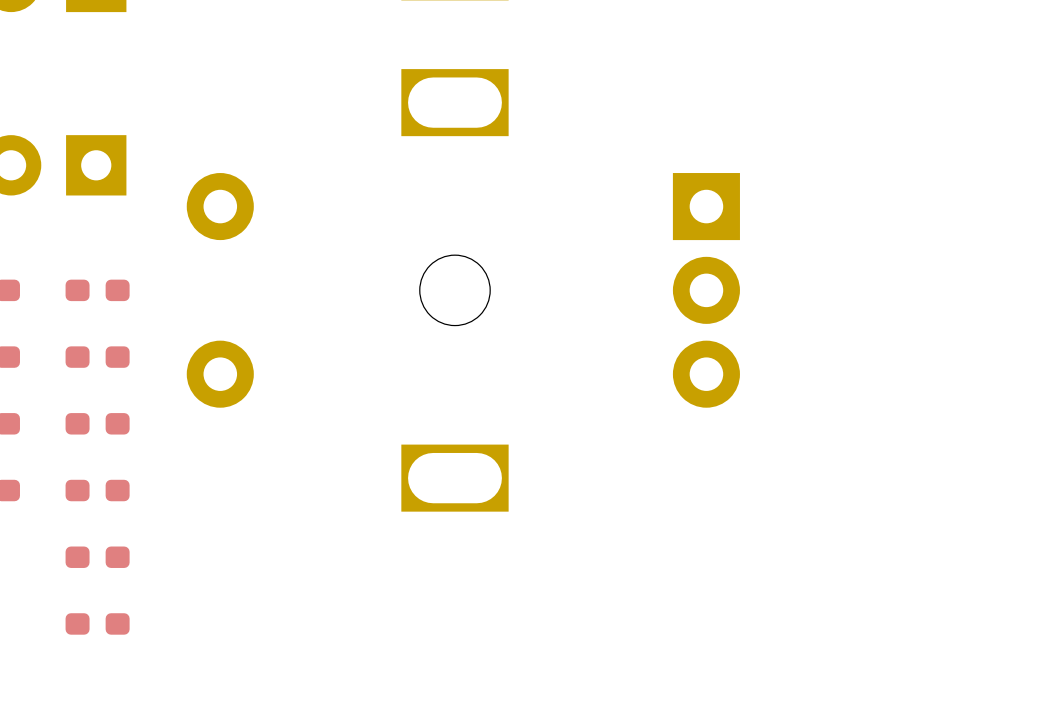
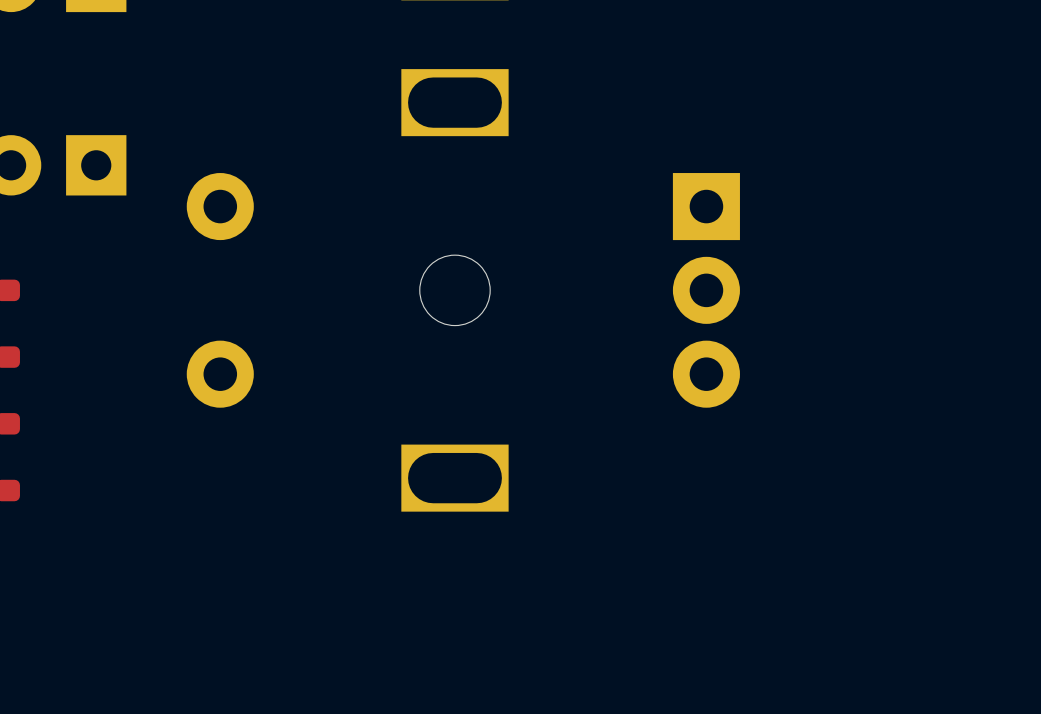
part: (97, 290) -> none
part: (97, 357) -> none
part: (97, 423) -> none
part: (97, 490) -> none
part: (97, 557) -> none
part: (97, 623) -> none

